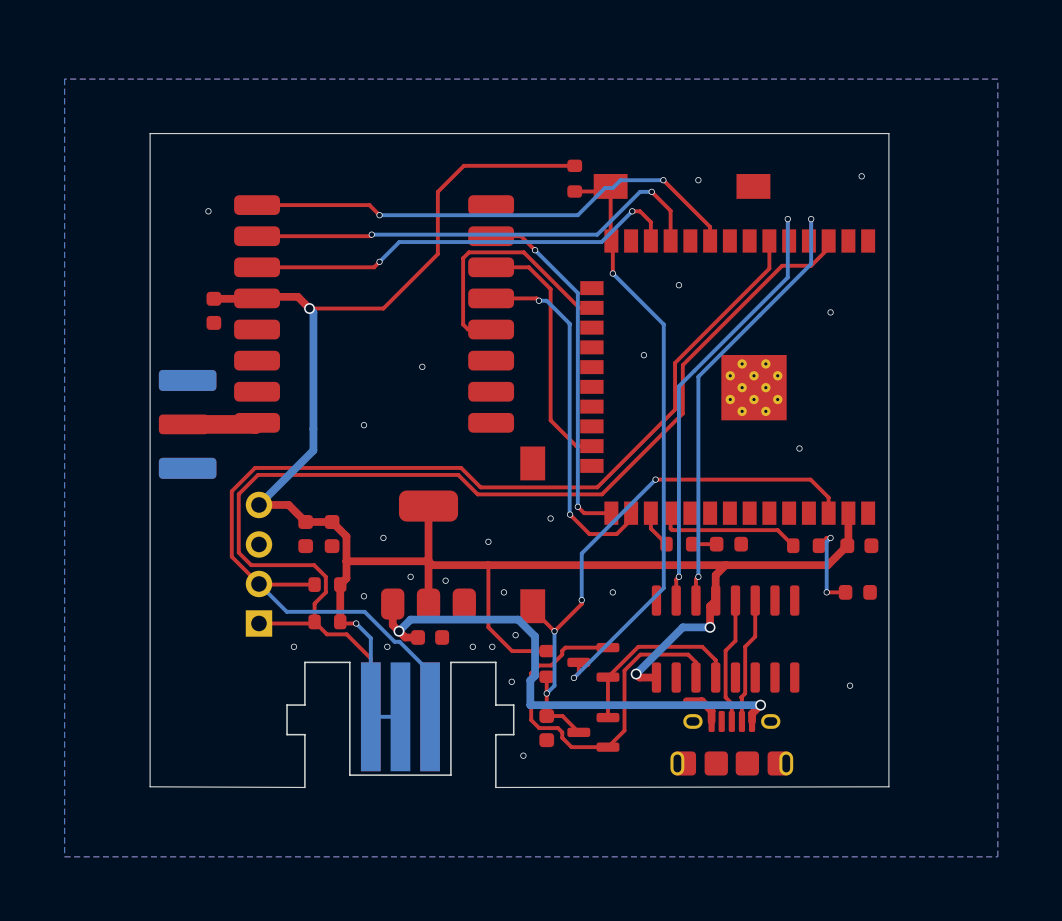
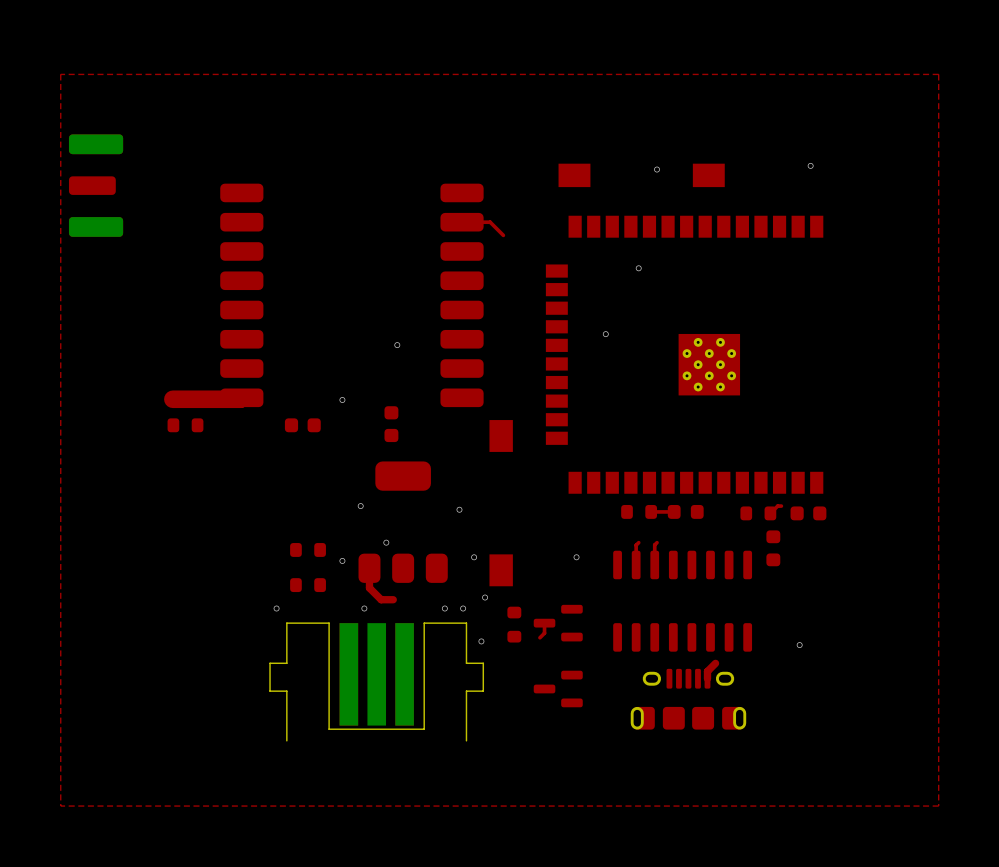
bottom zone outline: (997, 79) (64, 79) (64, 856) (997, 856) (997, 79) -> none
top track: (574, 165) (463, 165) (437, 191) (437, 254) (383, 308) (309, 308) (297, 296) (213, 298) -> none
part: (574, 178) -> none
top track: (663, 180) (710, 226) (710, 240) -> none
bottom track: (663, 180) (620, 180) (612, 187) (605, 187) (577, 215) (379, 215) -> none
via: (663, 180) -> none
top track: (574, 191) (605, 191) (610, 186) (612, 273) -> none
top track: (651, 191) (670, 210) (670, 240) -> none
bottom track: (651, 191) (640, 191) (597, 234) (371, 234) -> none
via: (651, 191) -> none
top track: (257, 205) (369, 205) (379, 215) -> none
via: (208, 211) -> none
top track: (632, 211) (640, 211) (650, 222) (650, 240) -> none
bottom track: (632, 211) (601, 242) (399, 242) (379, 261) -> none
via: (632, 211) -> none
via: (379, 215) -> none
bottom track: (787, 219) (787, 277) (678, 386) (678, 576) -> none
via: (787, 219) -> none
bottom track: (811, 219) (811, 263) (698, 376) (698, 576) -> none
via: (811, 219) -> none
top track: (371, 234) (370, 236) (257, 236) -> none
via: (371, 234) -> none
top track: (769, 240) (769, 268) (675, 362) (675, 409) (597, 487) (480, 487) (461, 467) (255, 467) (231, 491) (231, 556) (259, 584) (314, 584) -> none
top track: (828, 240) (828, 248) (811, 265) (782, 265) (682, 365) (682, 413) (601, 494) (477, 494) (458, 474) (258, 474) (238, 494) (238, 552) (251, 565) (314, 565) (325, 576) (325, 592) (314, 603) (314, 621) -> none
bottom track: (535, 250) (577, 292) (577, 506) -> none
via: (535, 250) -> none
top track: (379, 261) (374, 267) (257, 267) -> none
via: (379, 261) -> none
top track: (491, 267) (528, 267) (550, 289) (550, 420) (576, 446) (591, 446) -> none
bottom track: (612, 273) (663, 324) (663, 588) (573, 677) -> none
via: (612, 273) -> none
top track: (491, 298) (536, 298) (538, 300) -> none
bottom track: (538, 300) (546, 300) (570, 324) (570, 514) -> none
via: (538, 300) -> none
top track: (591, 307) (579, 307) (523, 252) (468, 252) (463, 258) (463, 324) (468, 329) (491, 329) -> none
bottom track: (309, 308) (313, 312) (313, 450) (258, 504) -> none
via: (309, 308) -> none
part: (213, 310) -> none
via: (830, 312) -> none
part position: (187, 424) -> (96, 185)
via: (799, 448) -> none
part: none -> (391, 424)
part: none -> (185, 425)
part: none -> (302, 425)
top track: (655, 479) (810, 479) (828, 497) (828, 513) -> none
bottom track: (655, 479) (581, 553) (581, 600) -> none
via: (655, 479) -> none
top track: (258, 504) (288, 504) (305, 522) (332, 522) (346, 536) (346, 578) (340, 584) (340, 621) (356, 623) -> none
top track: (428, 506) (428, 604) -> none
top track: (577, 506) (584, 513) (611, 513) -> none
via: (577, 506) -> none
top track: (631, 513) (631, 519) (616, 534) (589, 534) (570, 514) -> none
top track: (650, 513) (650, 528) (666, 544) -> none
top track: (670, 513) (672, 530) (777, 530) (793, 545) -> none
top track: (848, 513) (848, 544) (827, 565) (432, 565) (428, 561) (346, 561) -> none
via: (570, 514) -> none
via: (550, 518) -> none
part: (305, 534) -> none
part: (332, 534) -> none
bottom track: (830, 537) (826, 541) (826, 592) -> none
via: (830, 537) -> none
part: (258, 564) -> none
top track: (488, 565) (488, 627) (512, 651) (546, 651) -> none
top track: (725, 565) (715, 575) (715, 600) (710, 606) (710, 627) -> none
via: (678, 576) -> none
via: (698, 576) -> none
via: (445, 580) -> none
bottom track: (258, 583) (286, 611) (364, 611) (394, 641) (399, 641) (430, 672) (430, 716) -> none
via: (826, 592) -> none
top track: (845, 592) (826, 592) -> none
part rotation: 0° (857, 592) -> 90° clockwise (773, 548)
part position: (857, 592) -> (773, 548)
top track: (581, 600) (581, 604) (554, 631) (532, 609) (532, 606) -> none
via: (581, 600) -> none
top track: (735, 600) (735, 640) (725, 650) (725, 697) (731, 703) (731, 721) -> none
top track: (755, 600) (755, 636) (745, 646) (745, 693) (741, 697) (741, 721) -> none
top track: (314, 621) (327, 634) (346, 634) (370, 658) (370, 716) -> none
top track: (314, 621) (313, 623) (258, 623) -> none
bottom track: (356, 623) (370, 638) (370, 716) (400, 716) -> none
via: (356, 623) -> none
bottom track: (710, 627) (682, 627) (636, 674) -> none
via: (710, 627) -> none
bottom track: (398, 631) (410, 619) (518, 619) (535, 636) (535, 675) (530, 680) (530, 705) (760, 705) -> none
via: (398, 631) -> none
bottom track: (554, 631) (554, 685) (546, 693) -> none
via: (554, 631) -> none
part: (430, 637) -> none
top track: (607, 647) (565, 647) (562, 650) (562, 654) (551, 665) (538, 665) (531, 673) (531, 720) (539, 728) (558, 728) (562, 732) (562, 737) (571, 747) (607, 747) (624, 730) (624, 670) (640, 654) (688, 654) (695, 662) (695, 677) -> none
top track: (636, 674) (639, 677) (656, 677) -> none
via: (636, 674) -> none
top track: (546, 676) (546, 716) (562, 716) (578, 732) -> none
via: (573, 677) -> none
top track: (715, 677) (715, 660) (702, 646) (638, 646) (607, 677) (607, 717) -> none
via: (546, 693) -> none
top track: (686, 701) (701, 701) (711, 710) (711, 721) -> none
via: (760, 705) -> none
part: (546, 728) -> none
via: (523, 755) -> none
board edge: (495, 787) (888, 786) (888, 133) (150, 133) (150, 786) (304, 787) -> none

